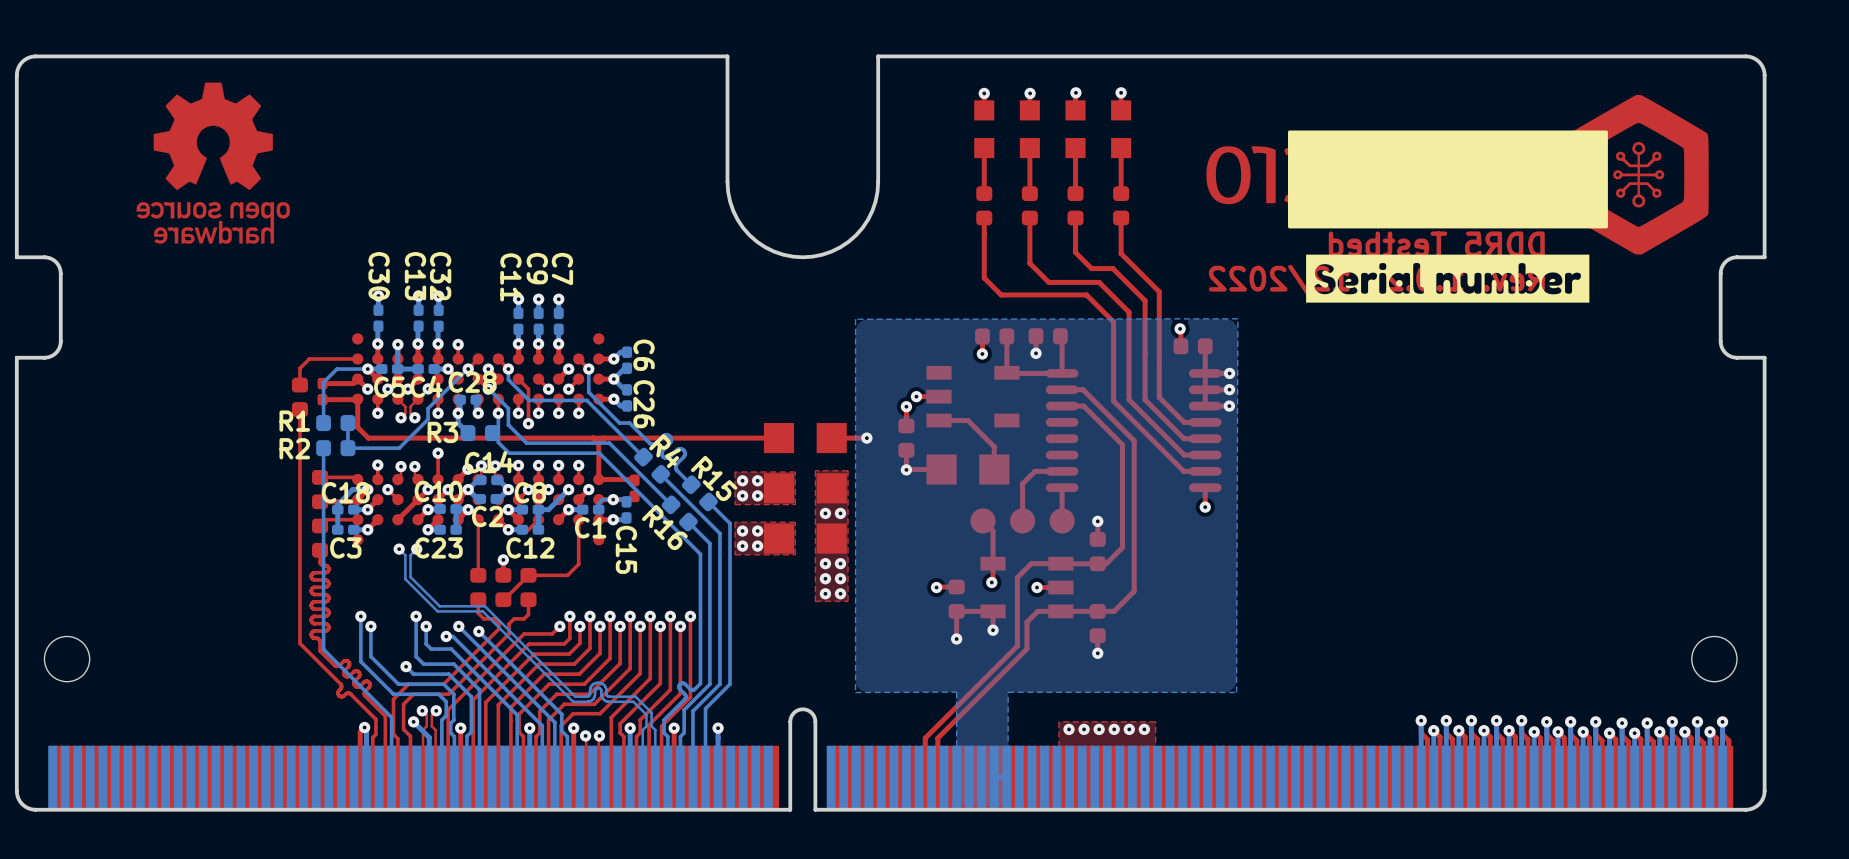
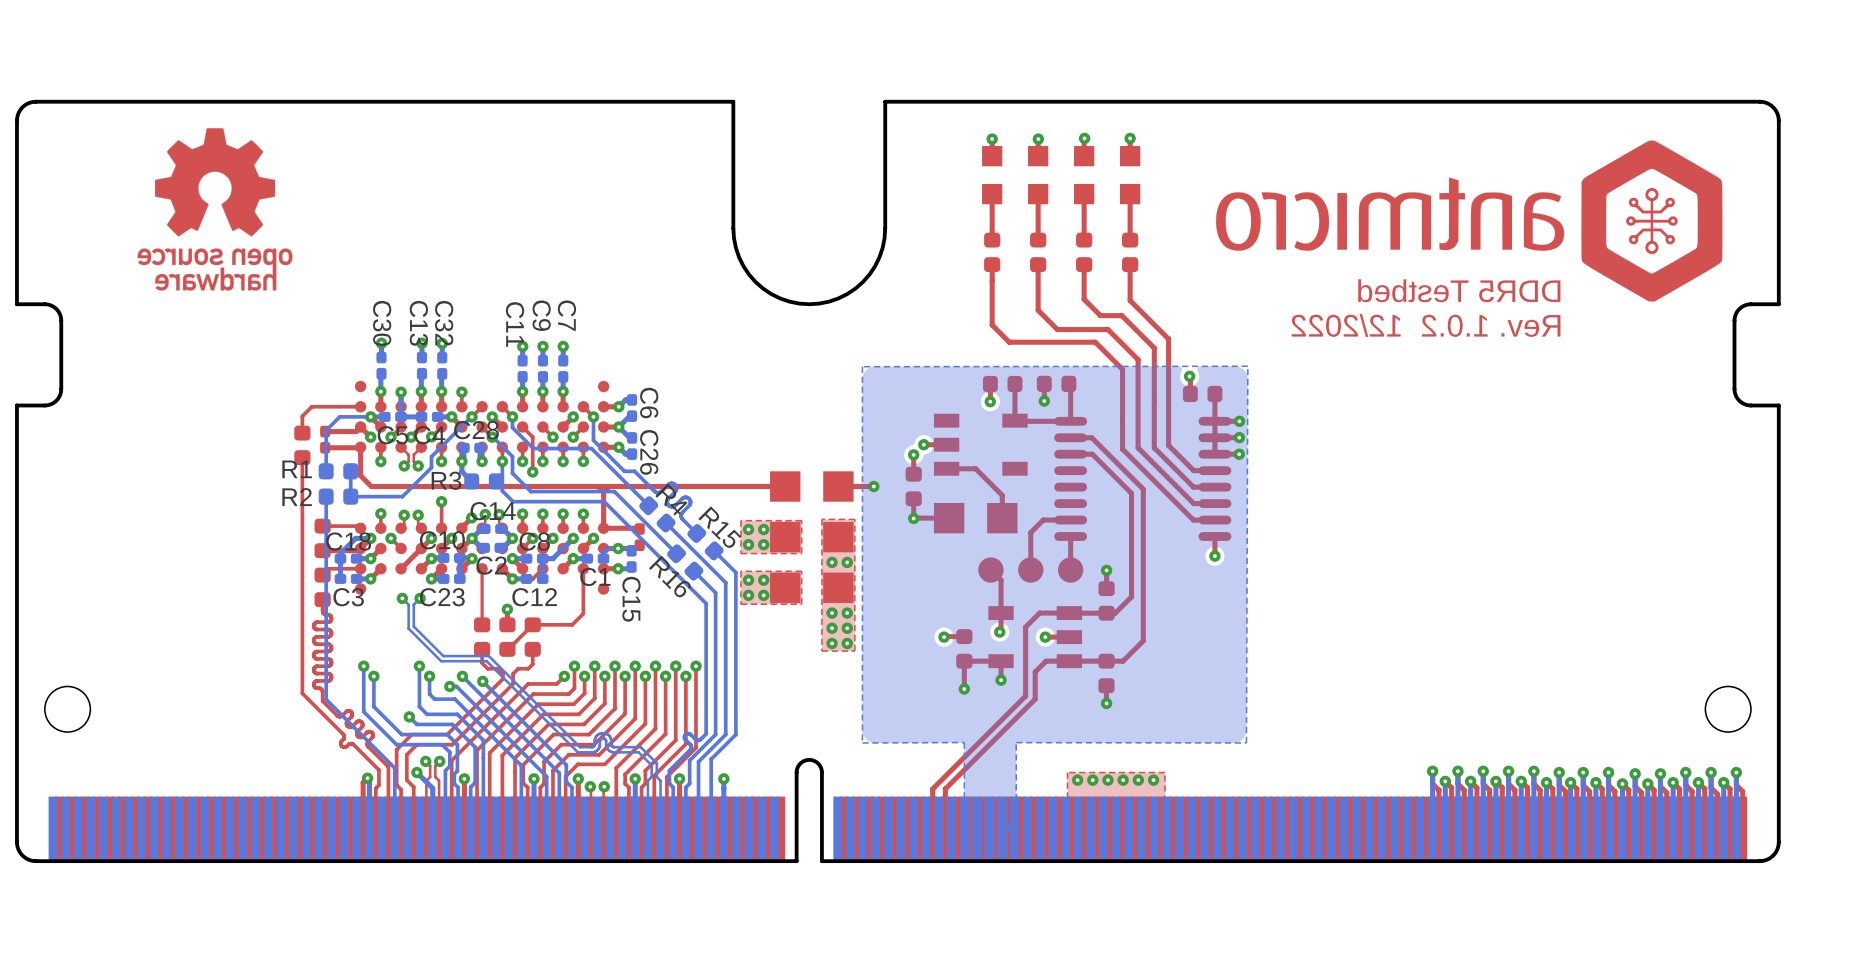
drawing: [1288, 130, 1608, 303] -> none

